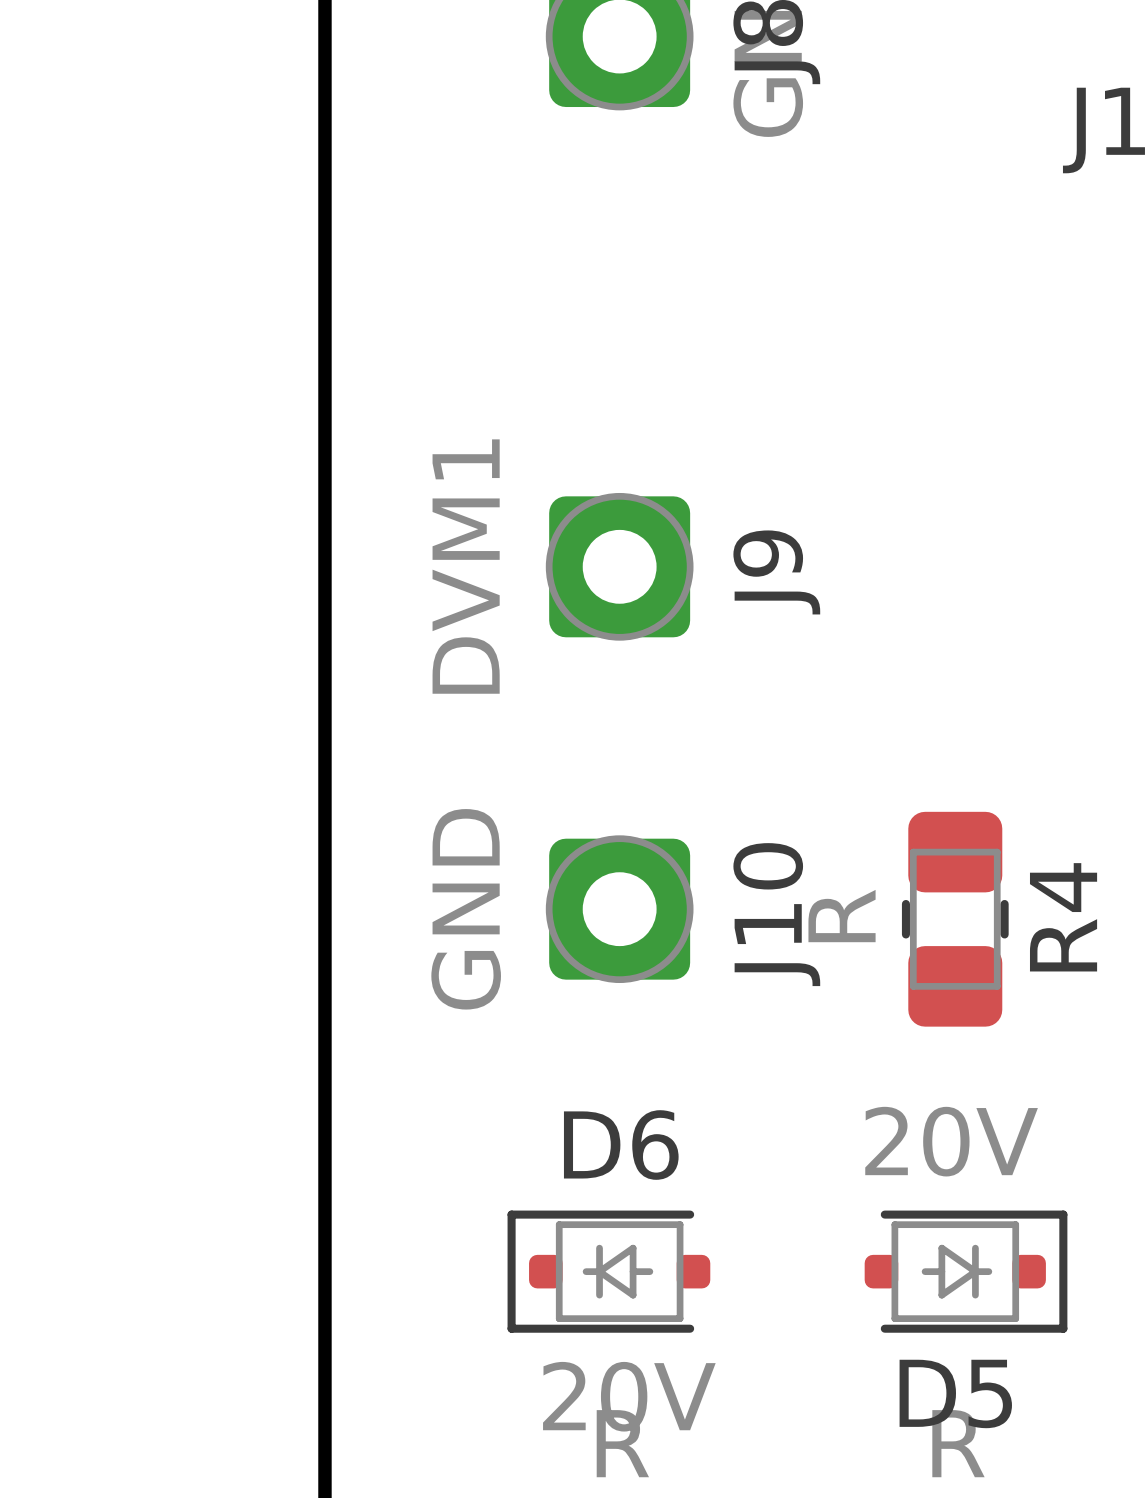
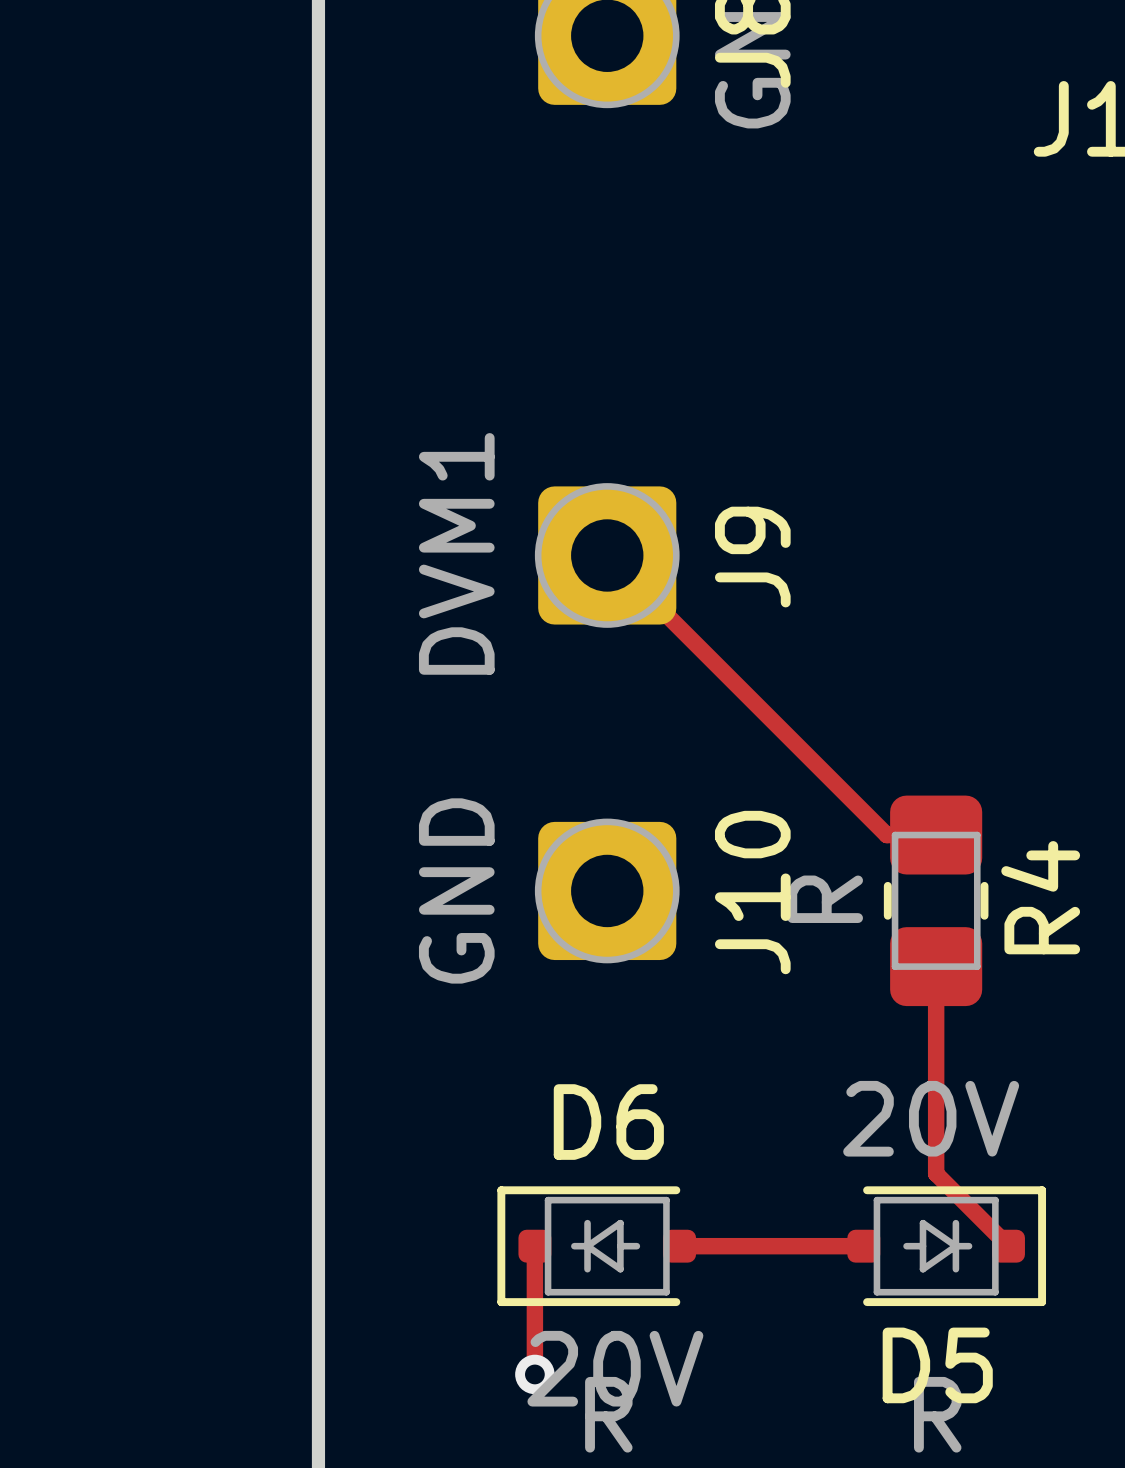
top track: none -> (607, 555) (886, 835) (936, 835)
top track: none -> (936, 966) (936, 1173) (1008, 1246)
top track: none -> (534, 1246) (534, 1374)
top track: none -> (679, 1246) (863, 1246)
via: none -> (534, 1374)

